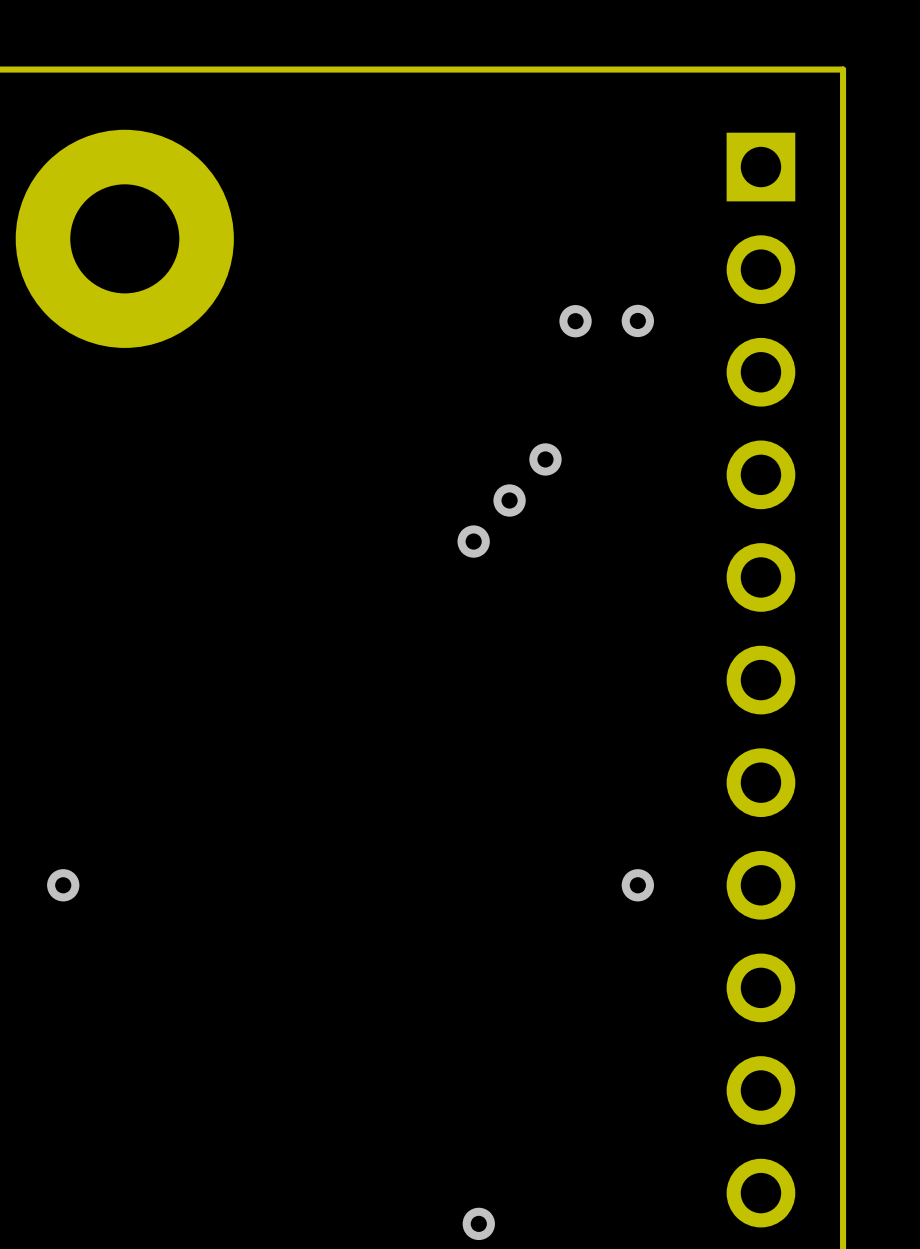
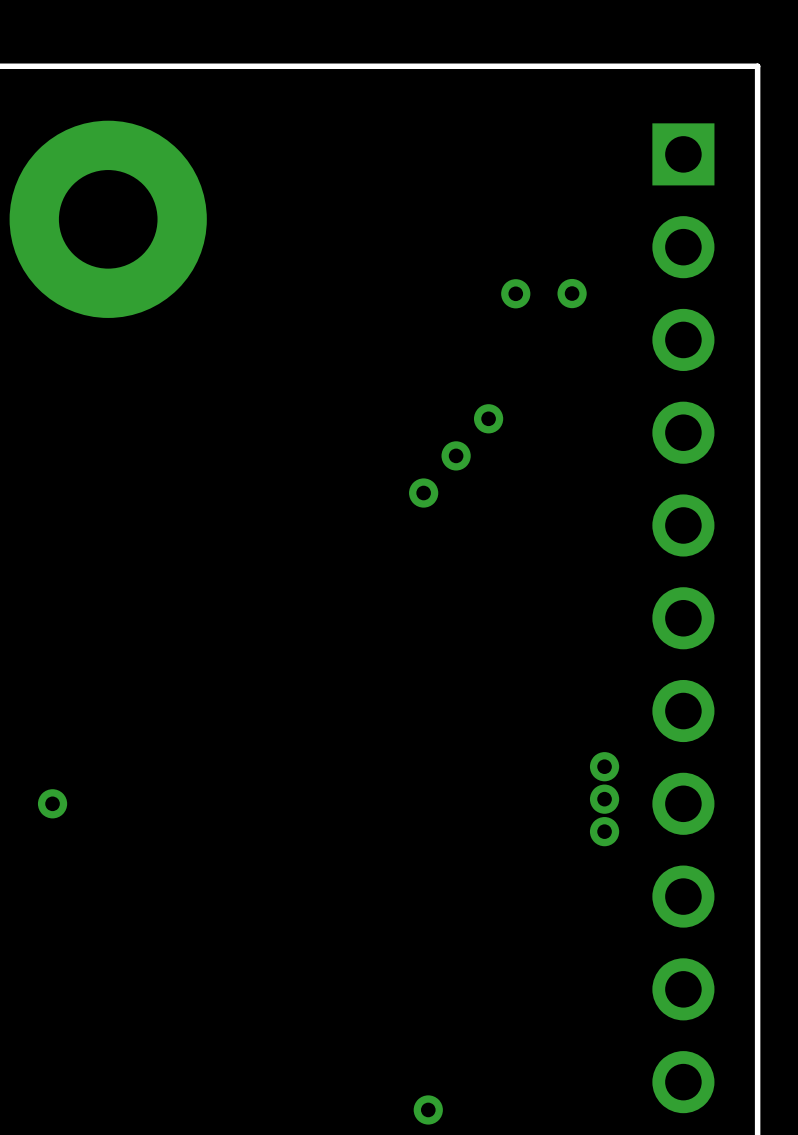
via: none -> (604, 766)
via: none -> (604, 799)
via: (637, 885) -> none
via: none -> (604, 831)

